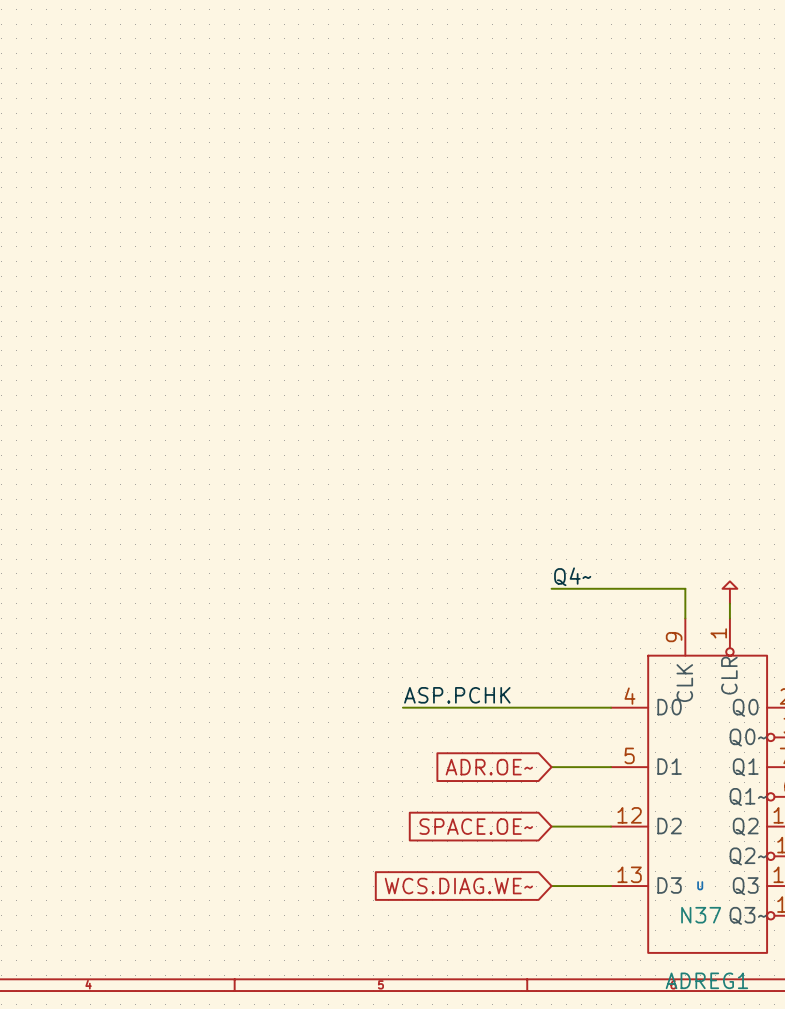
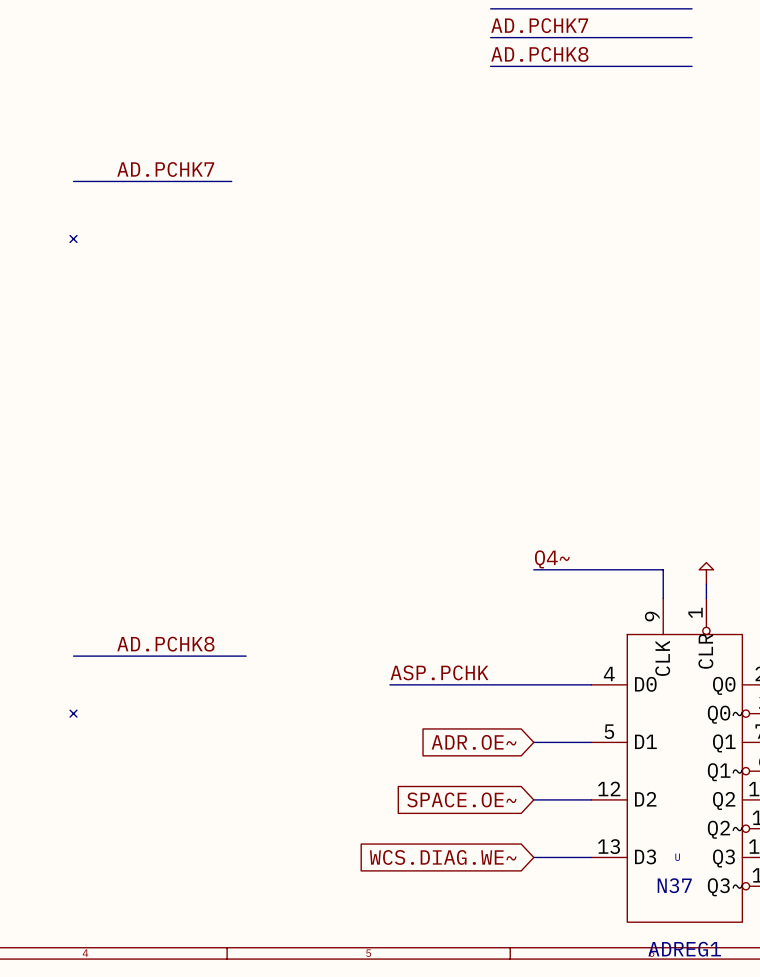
wire: none -> (490, 8) (692, 8)
label: none -> AD.PCHK7 (539, 25)
wire: none -> (490, 37) (692, 37)
label: none -> AD.PCHK8 (539, 54)
wire: none -> (490, 66) (692, 66)
label: none -> AD.PCHK7 (165, 169)
wire: none -> (73, 181) (231, 181)
no-connect mark: none -> (73, 238)
label: none -> AD.PCHK8 (165, 644)
wire: none -> (73, 656) (246, 656)
no-connect mark: none -> (73, 713)

